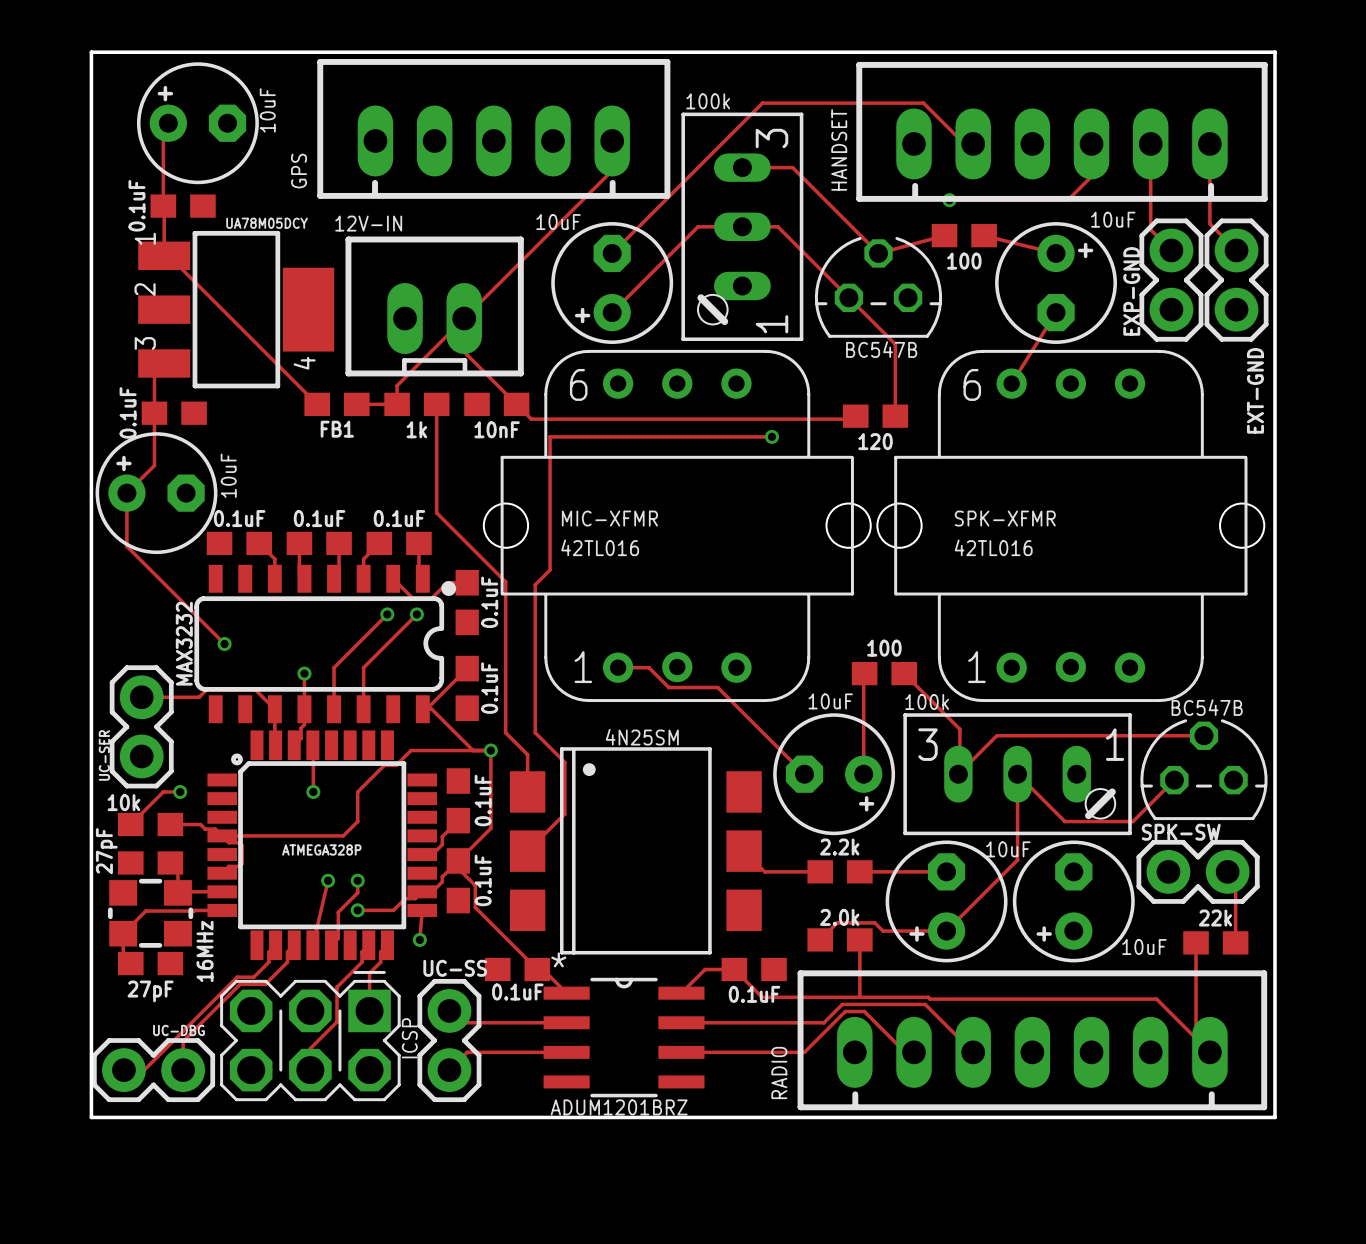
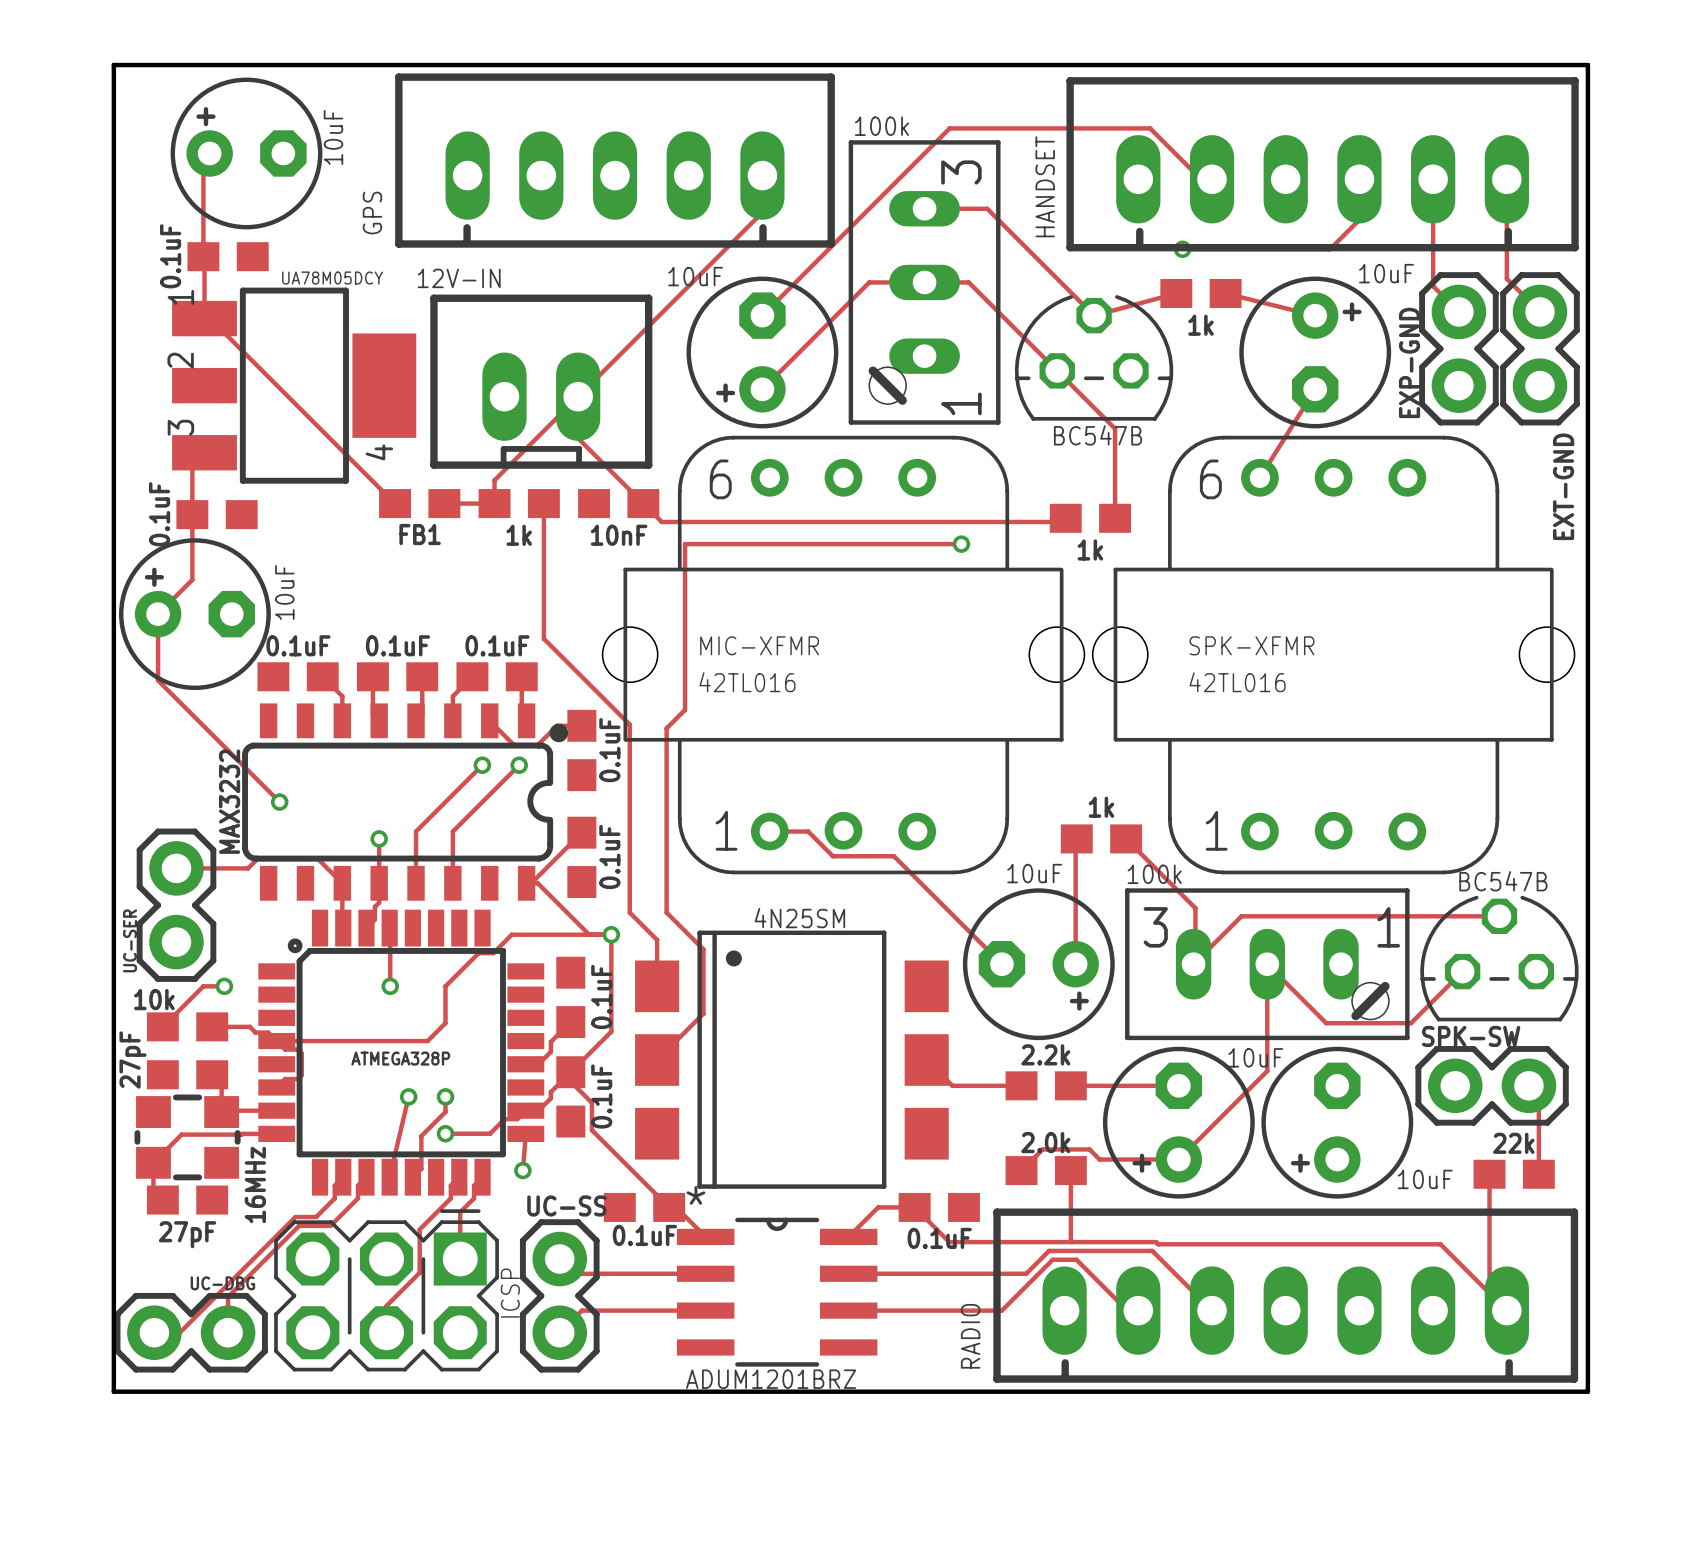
part value: 100 (964, 261) -> 1k (1200, 325)
part value: 120 (875, 441) -> 1k (1090, 550)
part value: 100 (884, 648) -> 1k (1101, 807)

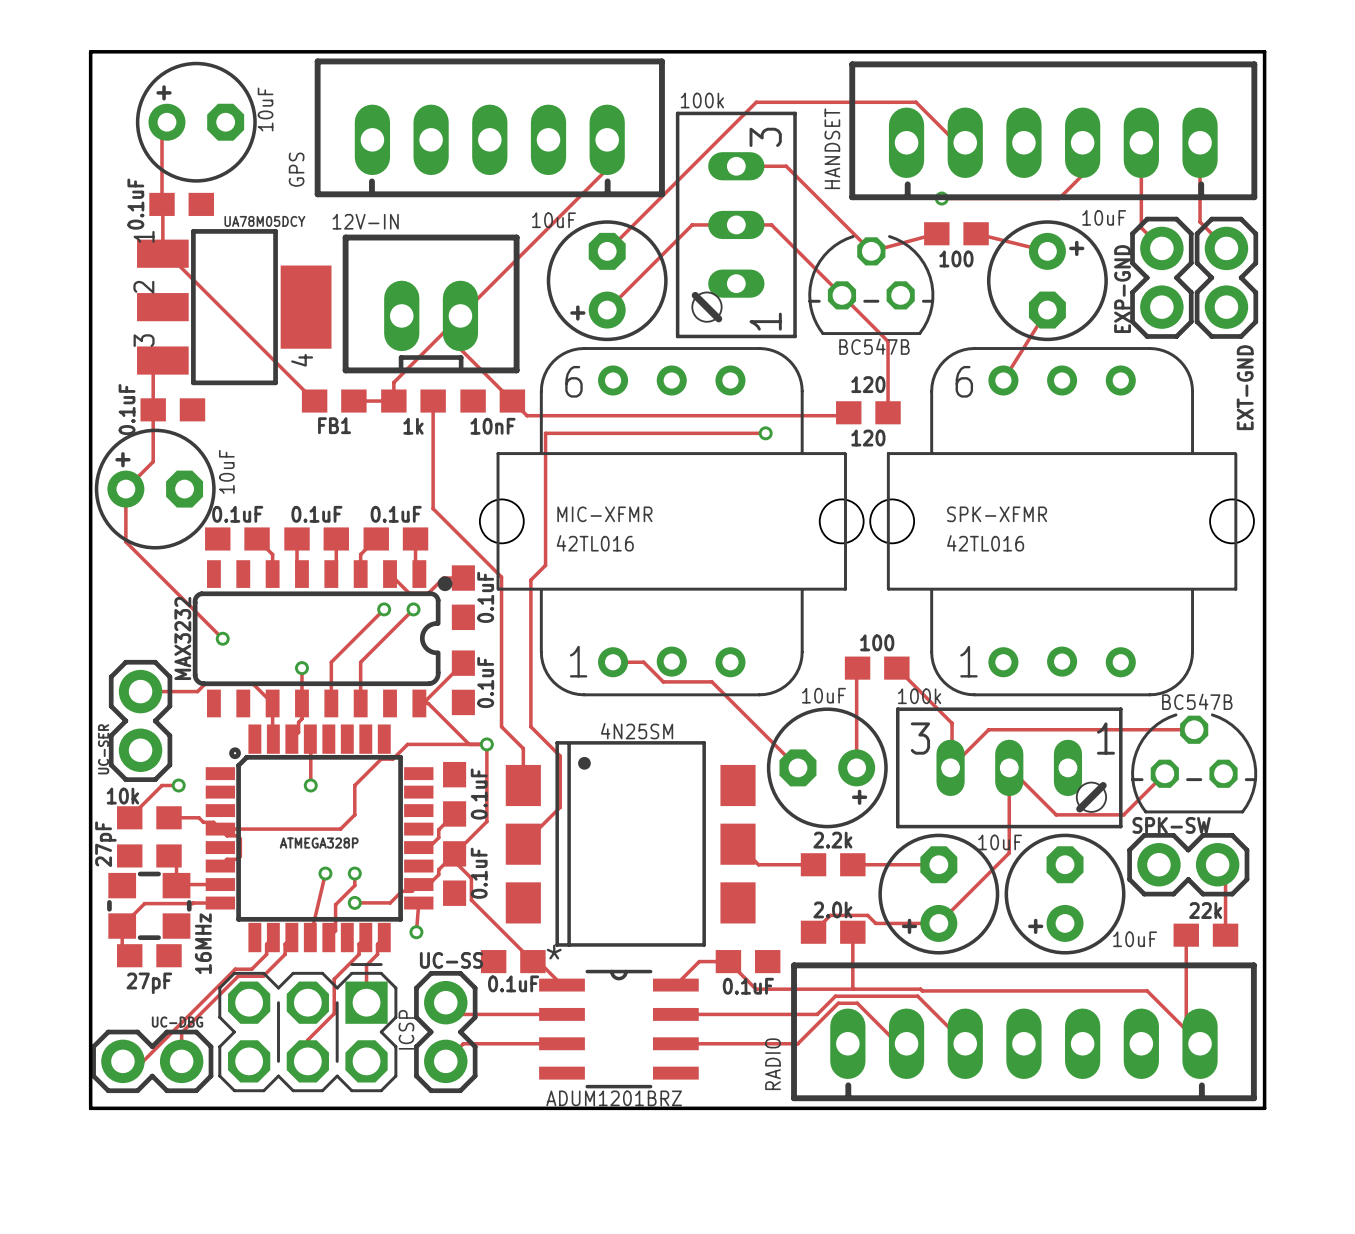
part value: 1k (1200, 325) -> 100 (956, 258)
text: none -> 120 (868, 384)
part value: 1k (1090, 550) -> 120 (868, 438)
part value: 1k (1101, 807) -> 100 (877, 642)

